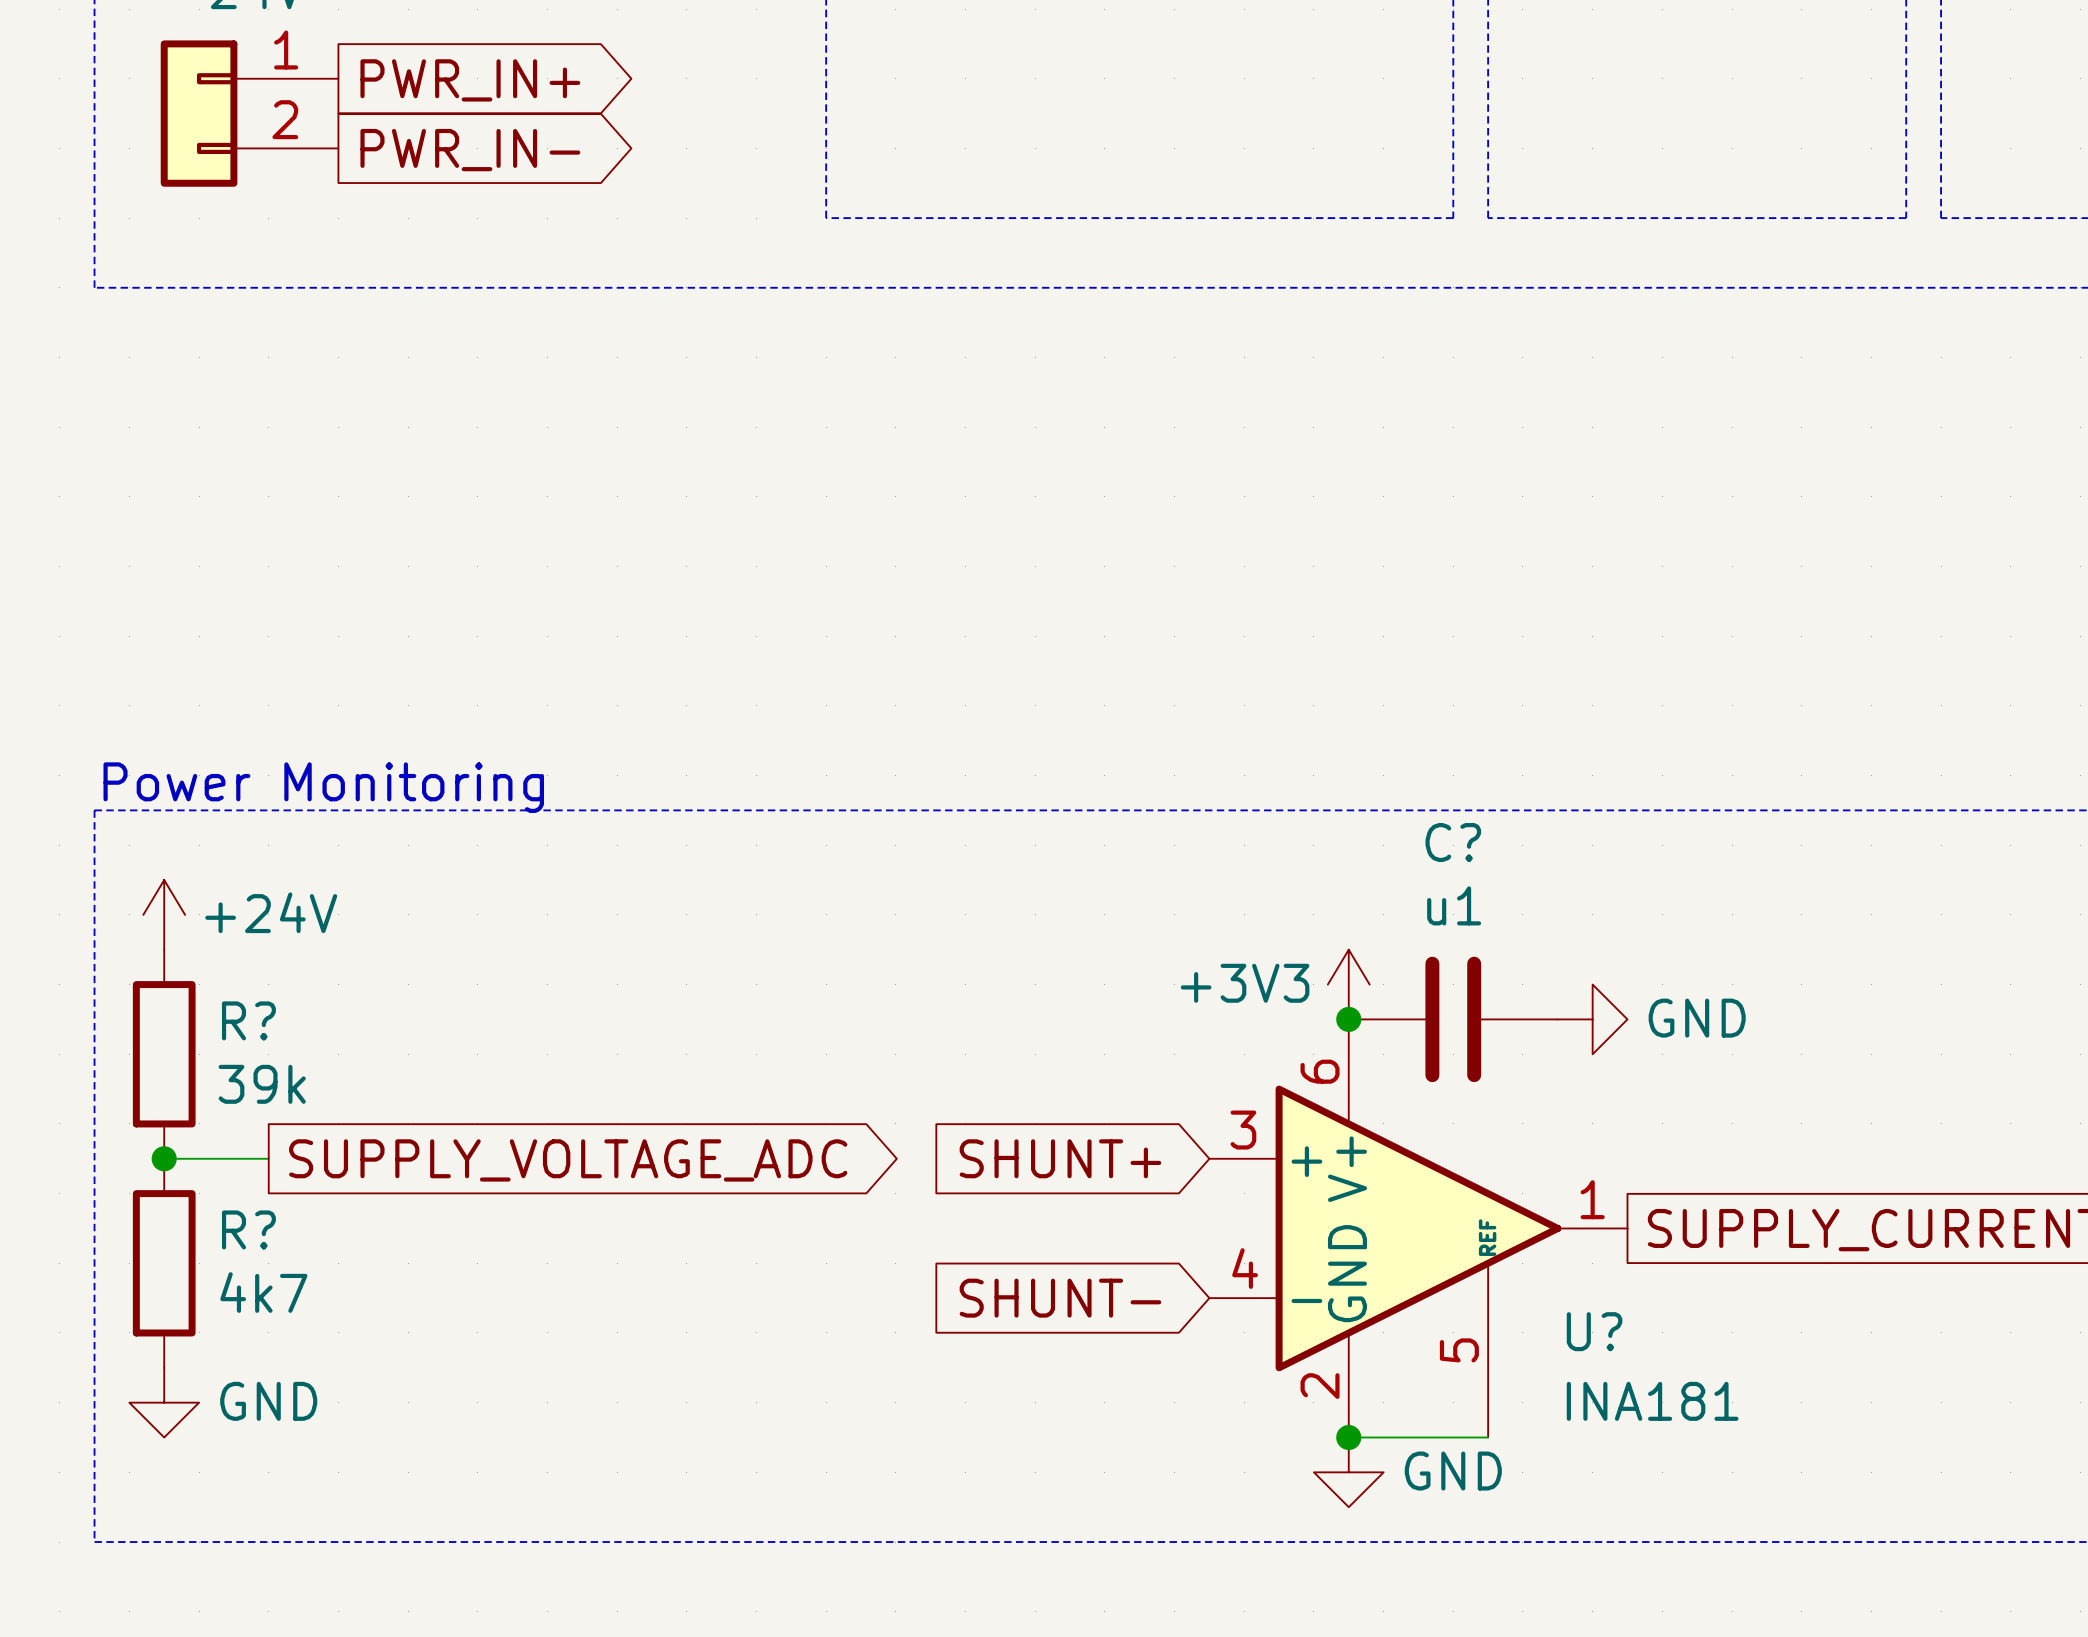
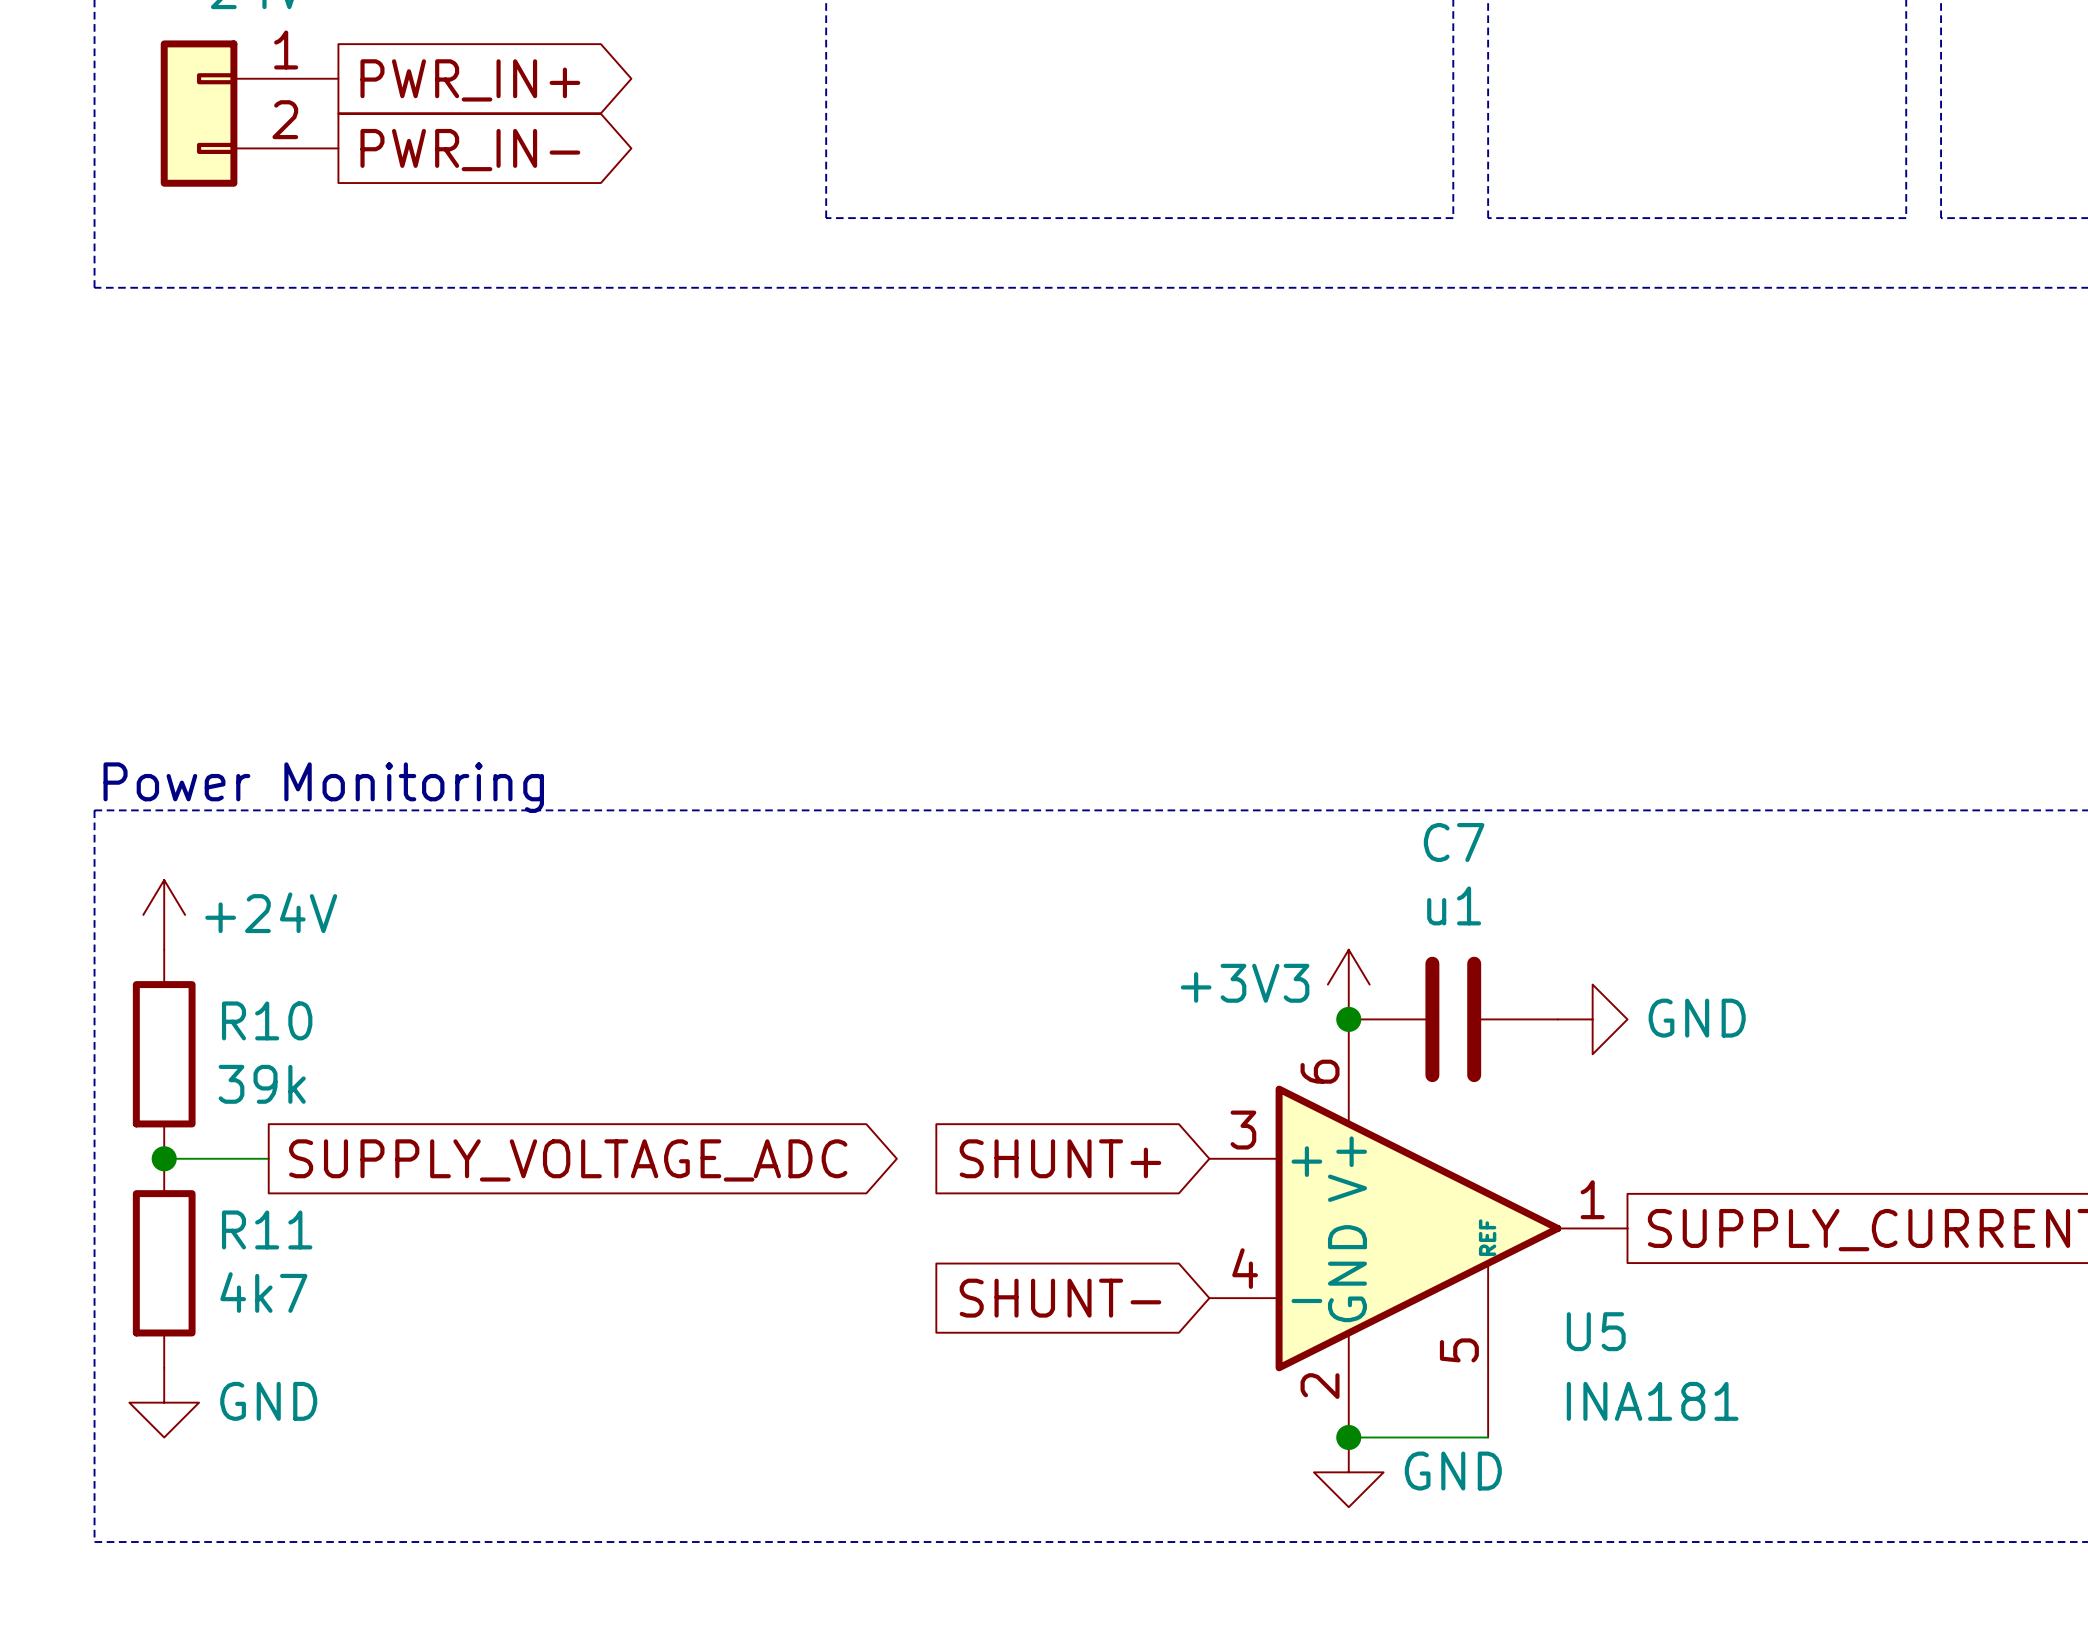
C? name: C? (1453, 842) -> C7 (1454, 842)
R? name: R? (248, 1020) -> R10 (267, 1020)
R? name: R? (248, 1229) -> R11 (267, 1229)
U? name: U? (1594, 1331) -> U5 (1596, 1331)

